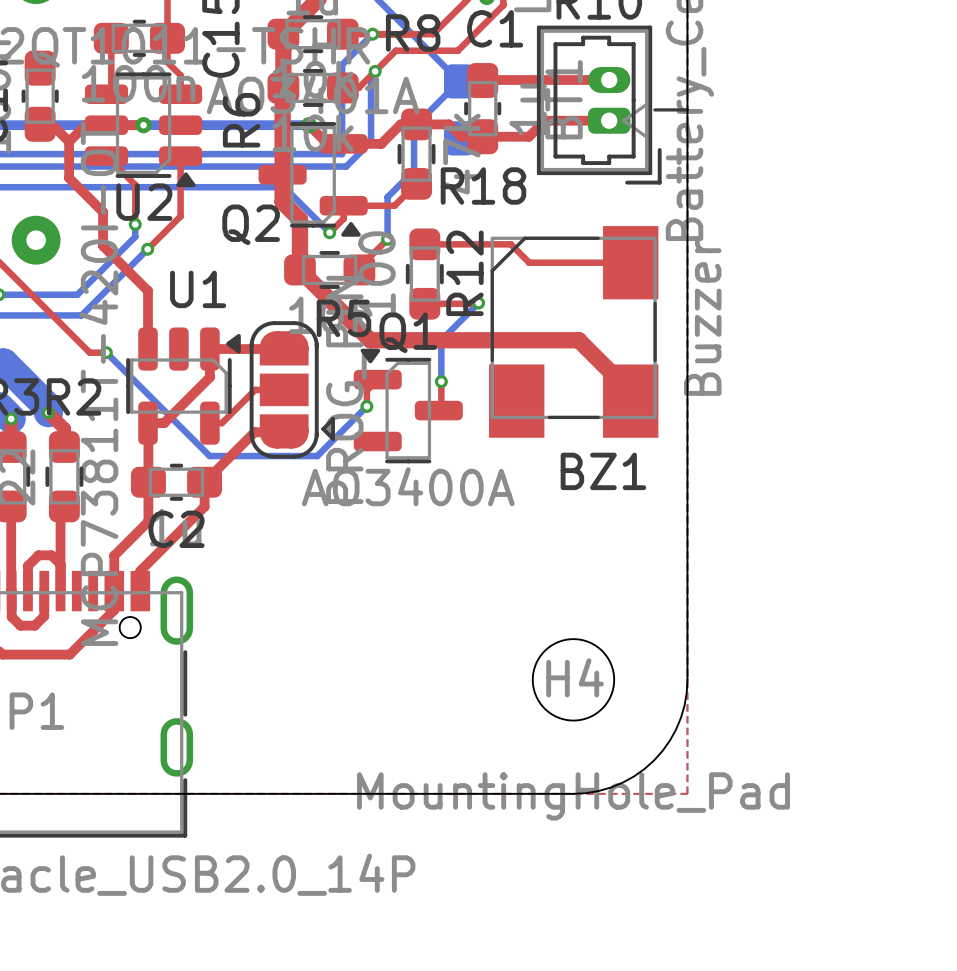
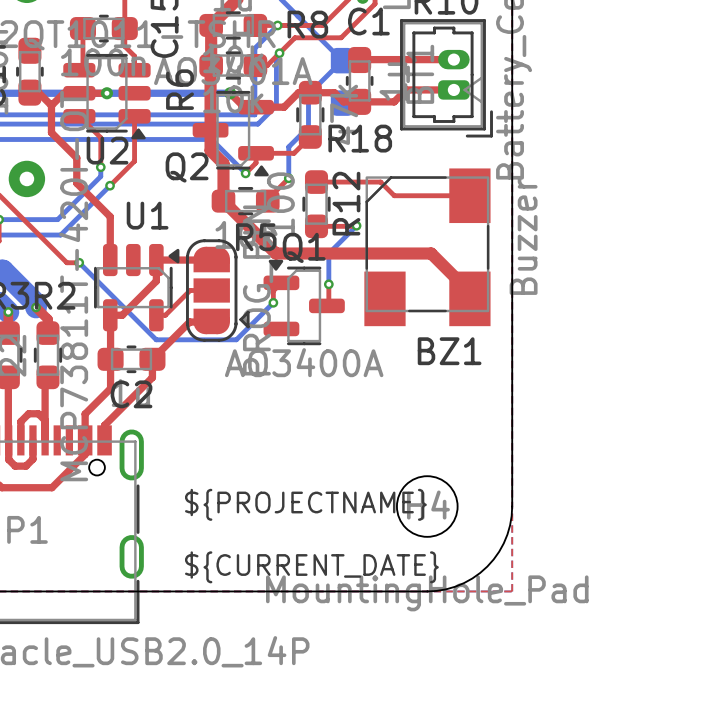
line: (654, 109) (687, 109) -> none
text: none -> ${PROJECTNAME} (305, 504)
text: none -> ${CURRENT_DATE} (311, 567)

